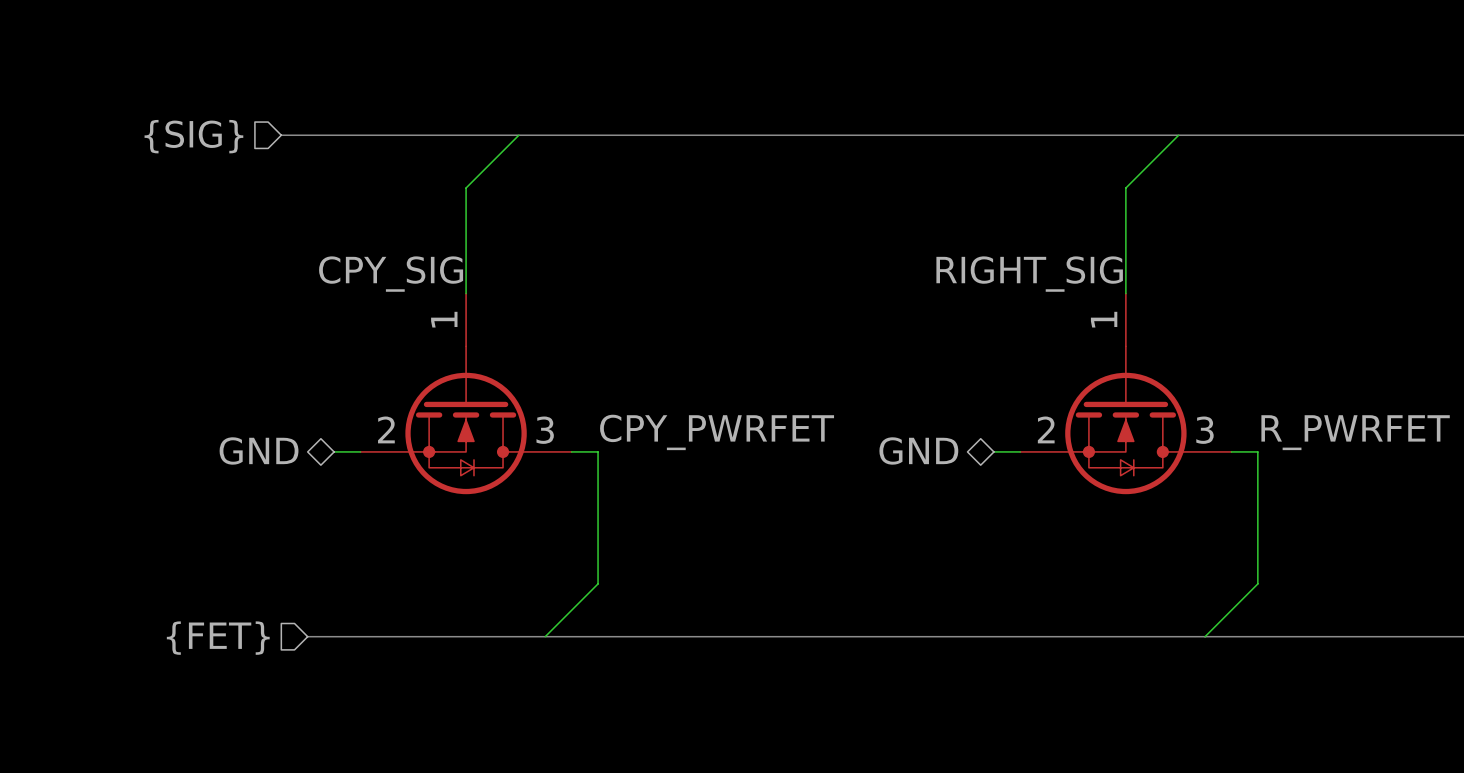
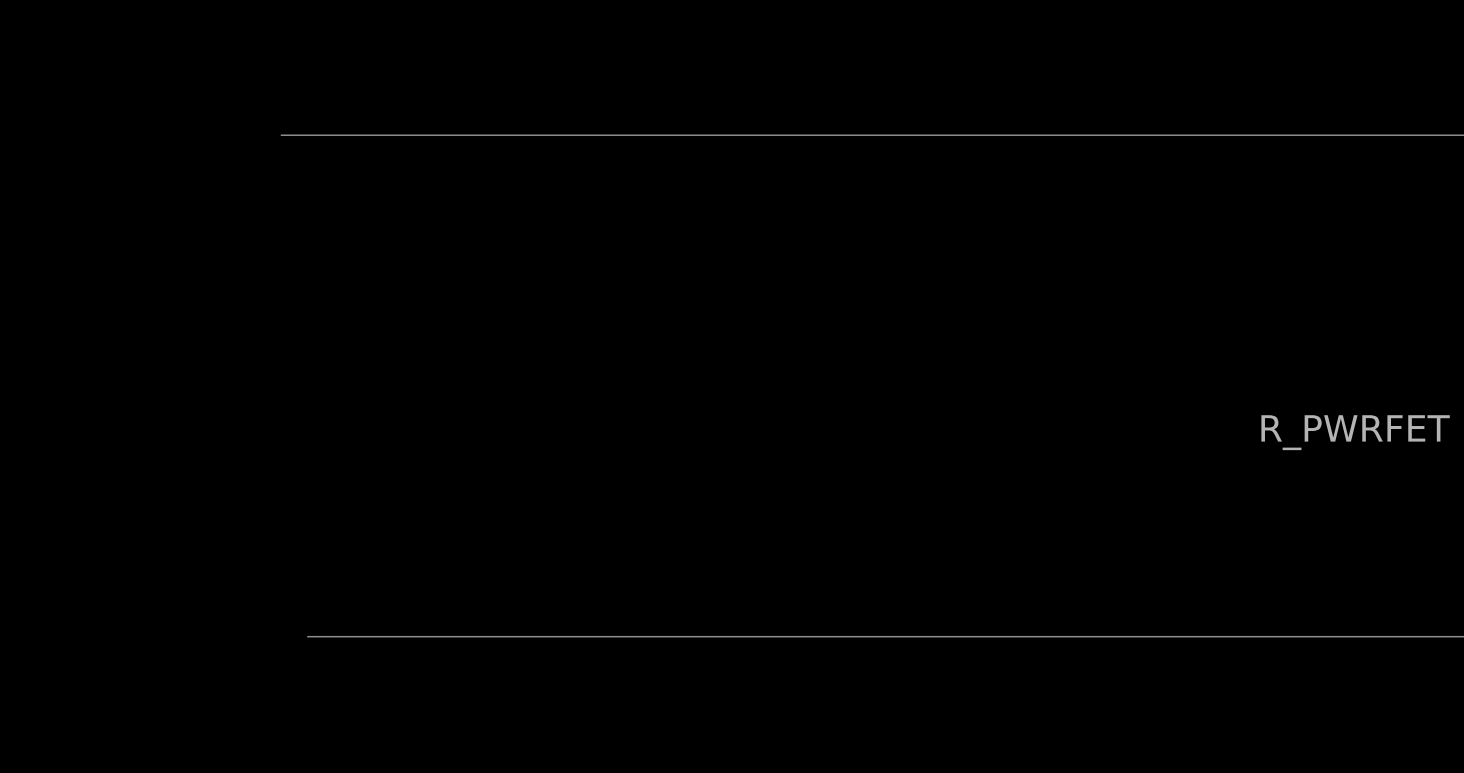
wire: (518, 135) (466, 188) (466, 293) -> none
wire: (1178, 135) (1125, 188) (1125, 293) -> none
hierarchical label: {SIG} (193, 136) -> none
label: CPY_SIG (391, 274) -> none
label: RIGHT_SIG (1029, 274) -> none
part: (466, 393) -> none
part: (1125, 393) -> none
label: CPY_PWRFET (717, 432) -> none
hierarchical label: GND (259, 450) -> none
hierarchical label: GND (918, 450) -> none
wire: (334, 451) (360, 451) -> none
wire: (571, 451) (598, 451) (598, 583) (545, 636) -> none
wire: (993, 451) (1020, 451) -> none
wire: (1231, 451) (1257, 451) (1257, 583) (1205, 636) -> none
hierarchical label: {FET} (218, 638) -> none

